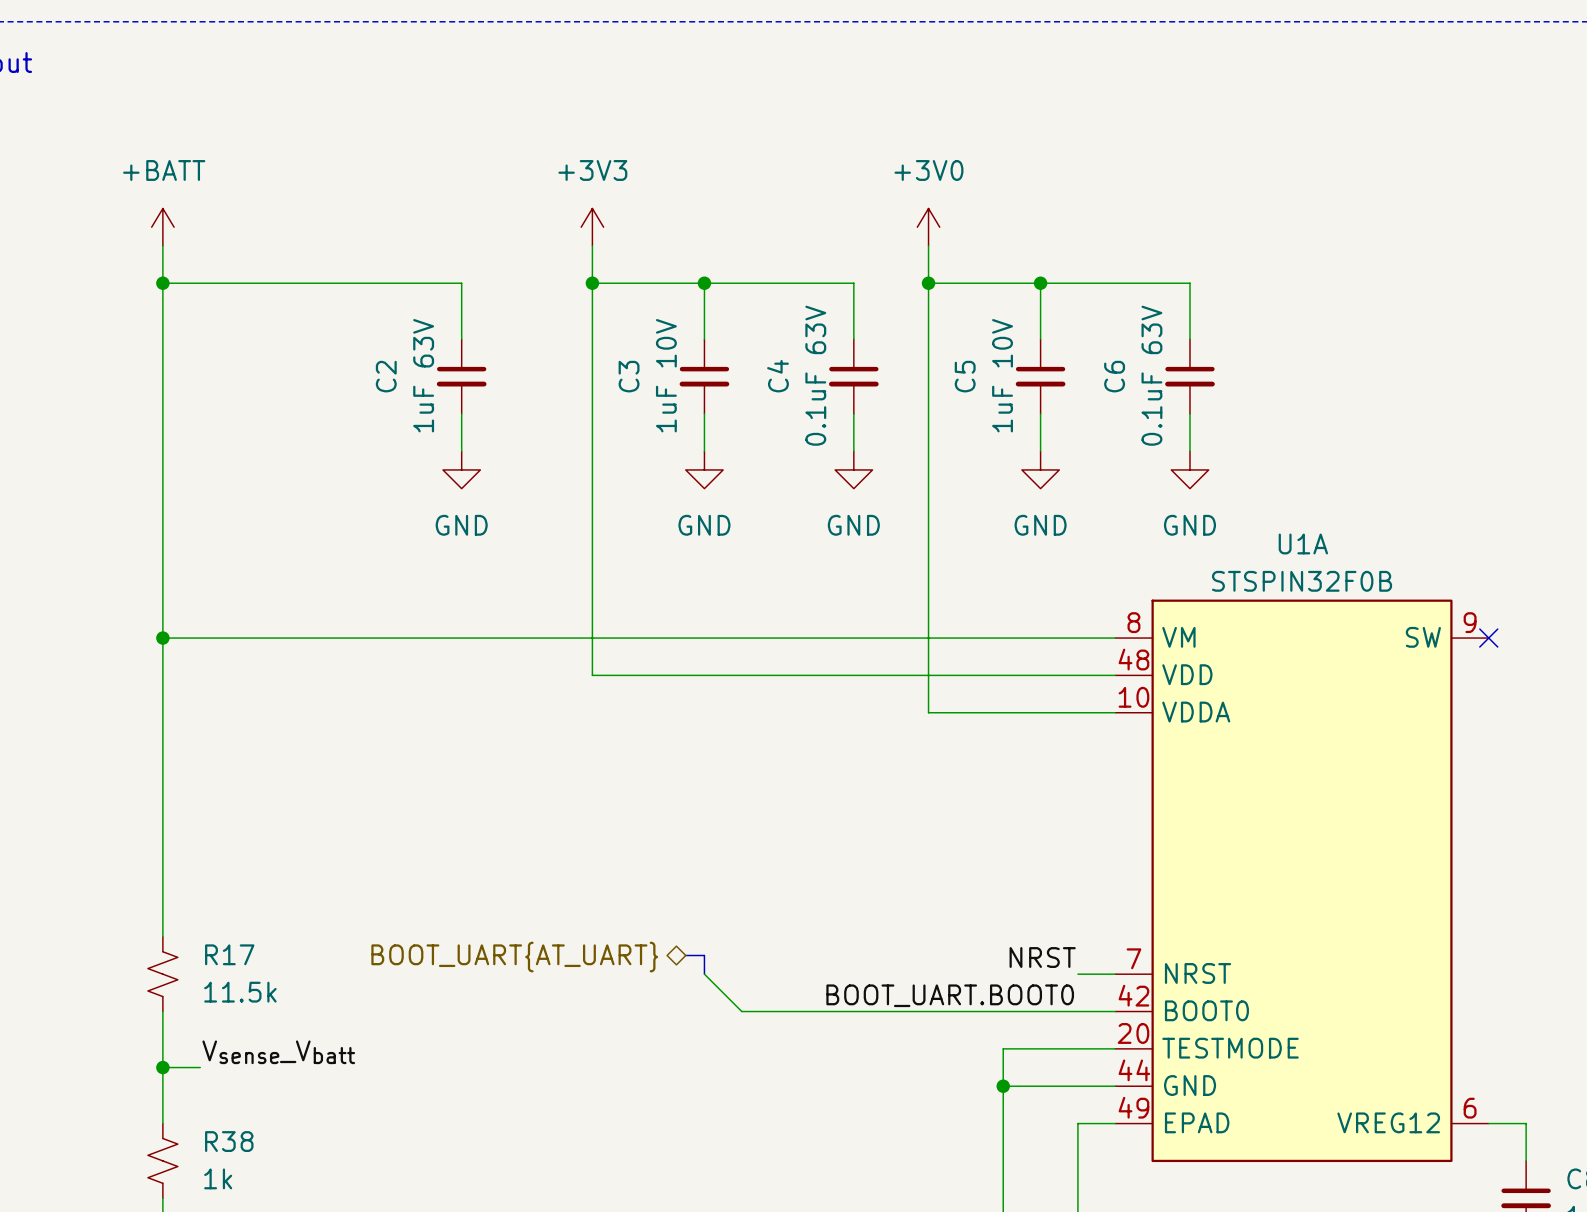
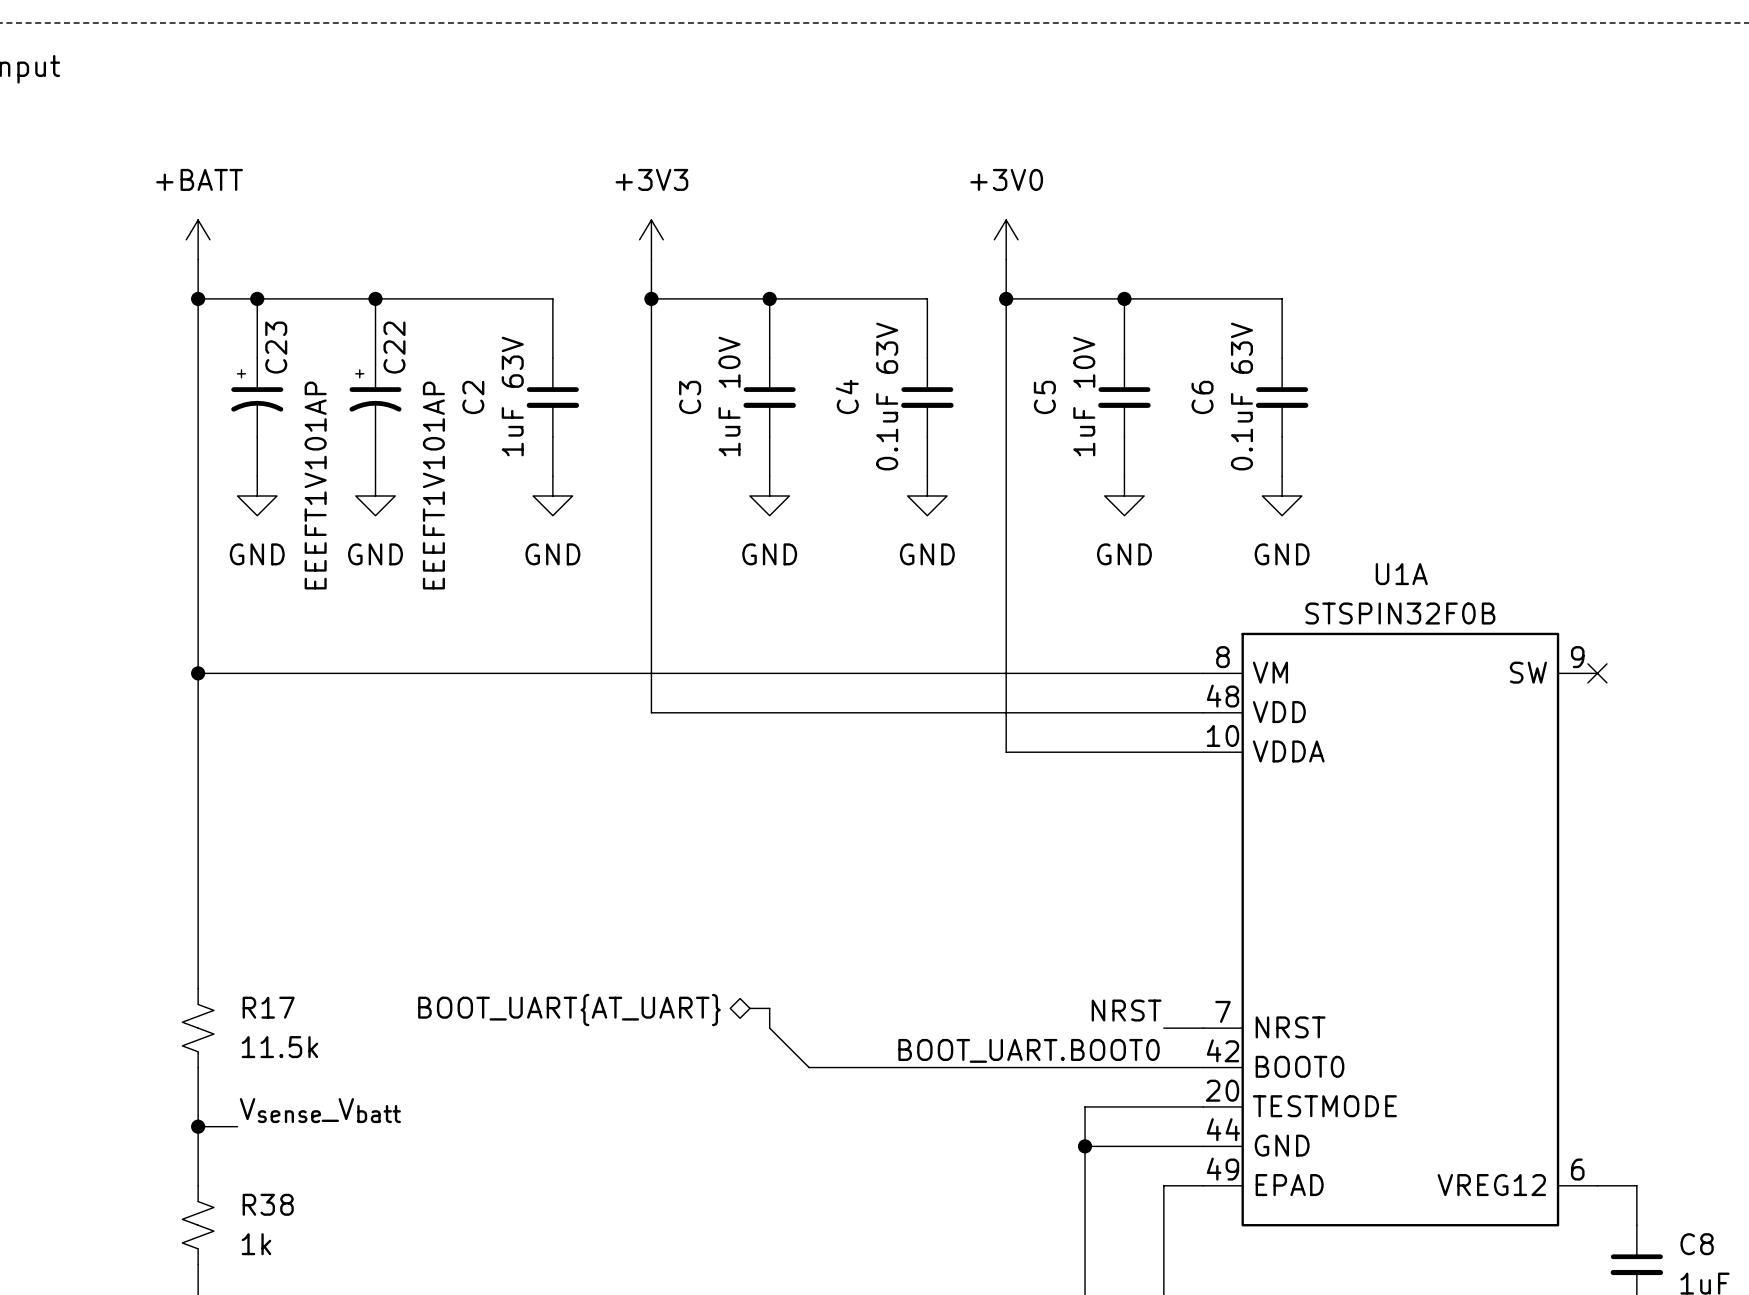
wire: none -> (257, 298) (257, 358)
junction: none -> (257, 298)
wire: none -> (375, 298) (375, 358)
junction: none -> (375, 298)
wire: (461, 283) (461, 339) -> (513, 298) (552, 298) (552, 358)
C23: none -> EEEFT1V101AP (257, 397)
C22: none -> EEEFT1V101AP (375, 397)
C2 position: (461, 376) -> (552, 397)
wire: none -> (257, 436) (257, 476)
wire: (461, 413) (461, 451) -> (375, 436) (375, 476)
wire: none -> (552, 436) (552, 476)
power symbol: none -> GND (257, 495)
power symbol: none -> GND (375, 495)
power symbol position: GND (461, 469) -> GND (552, 495)

